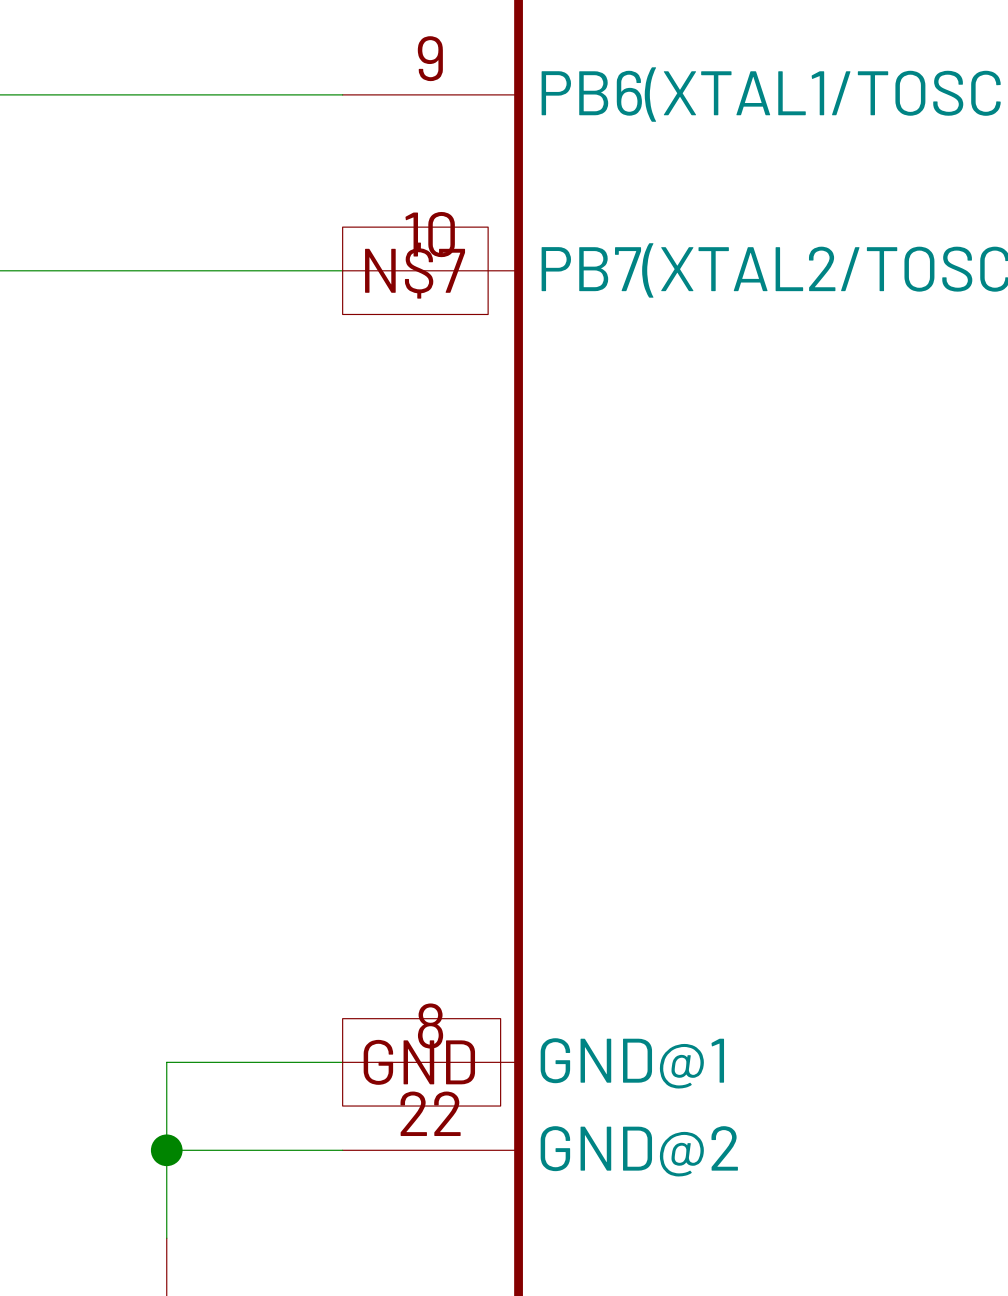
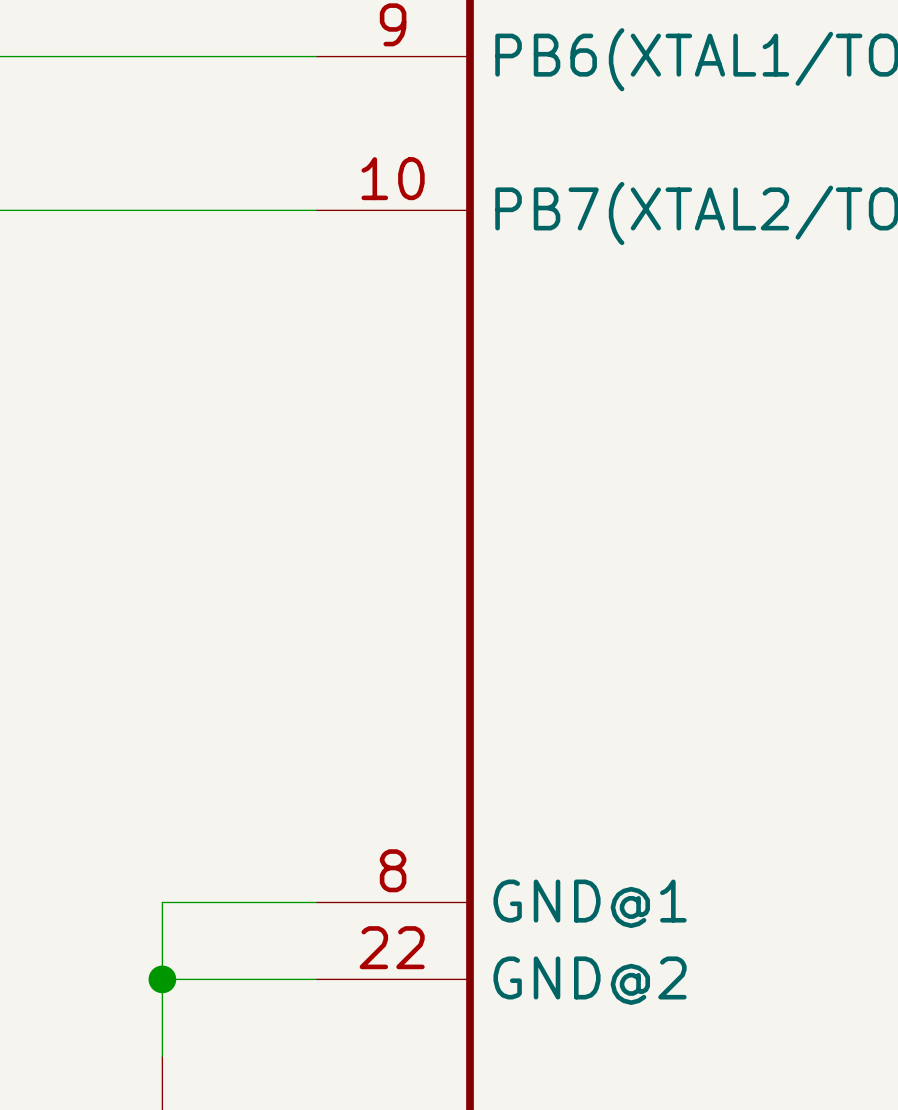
global label: N$7 (415, 270) -> none
global label: GND (419, 1062) -> none

